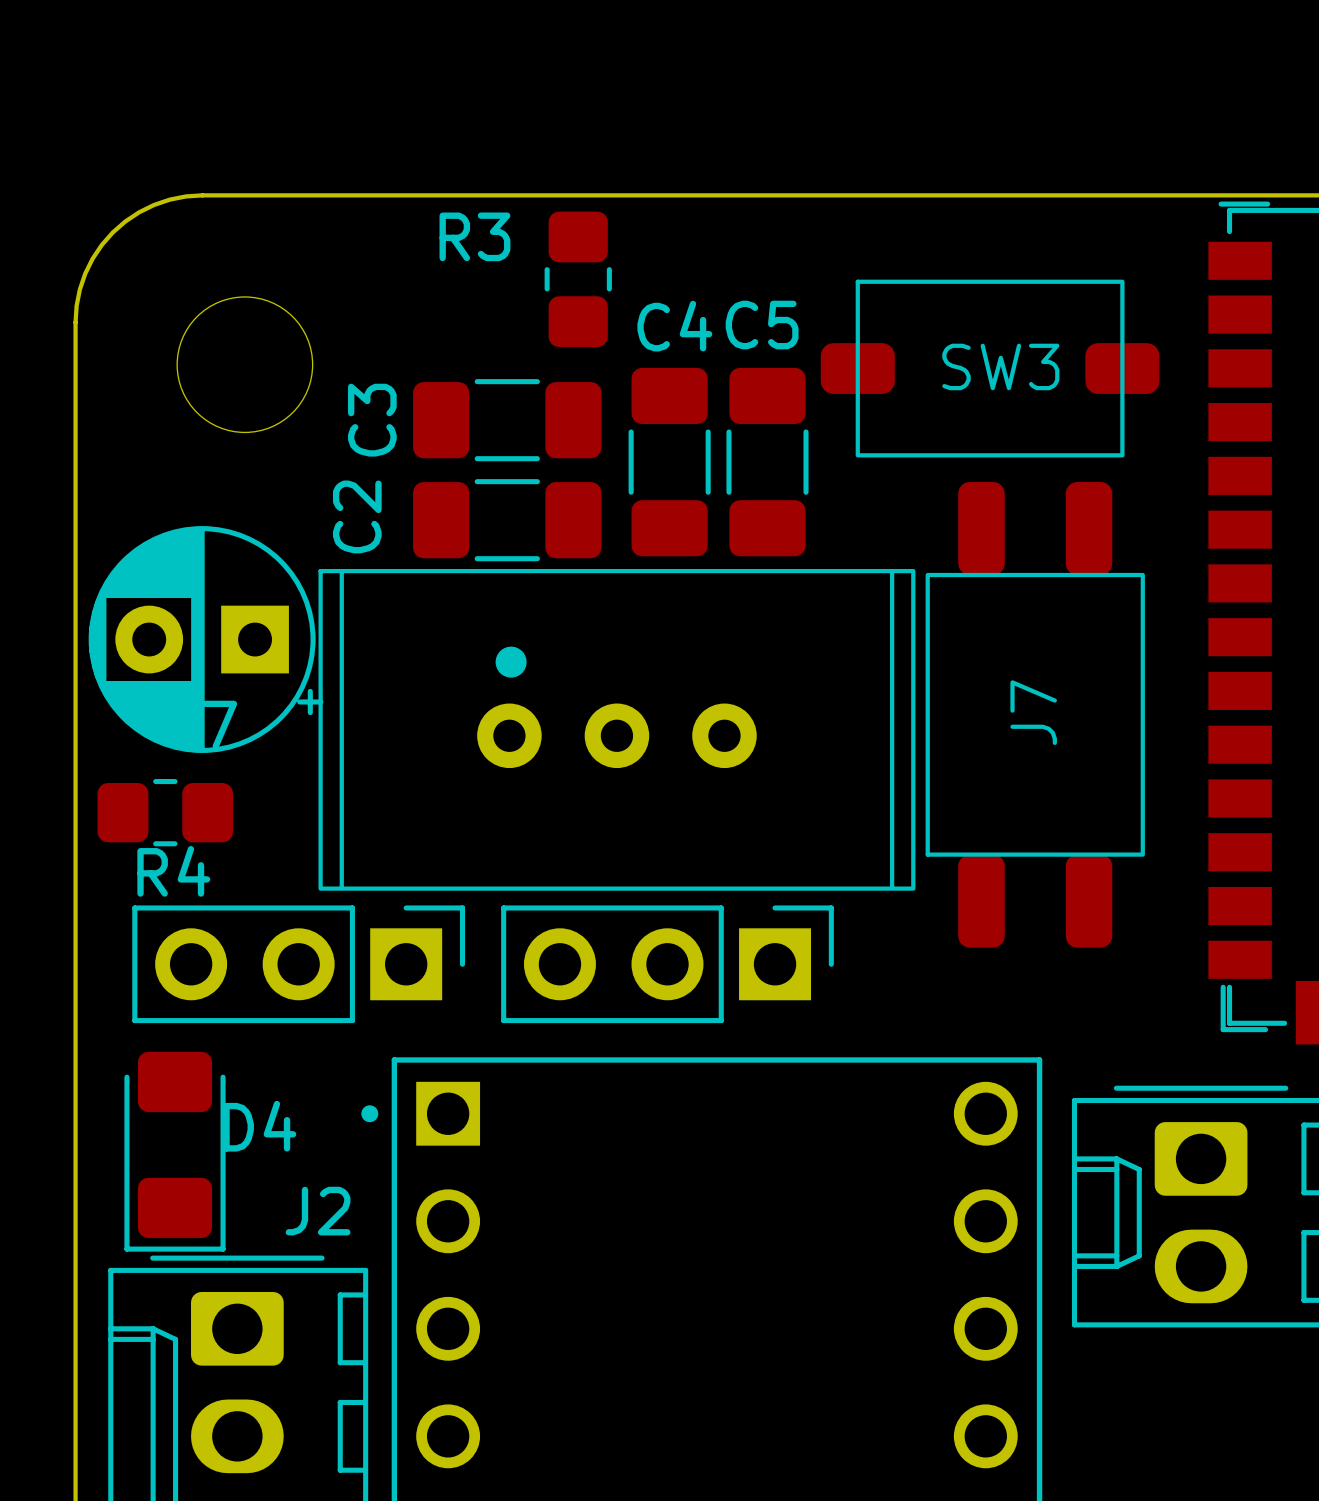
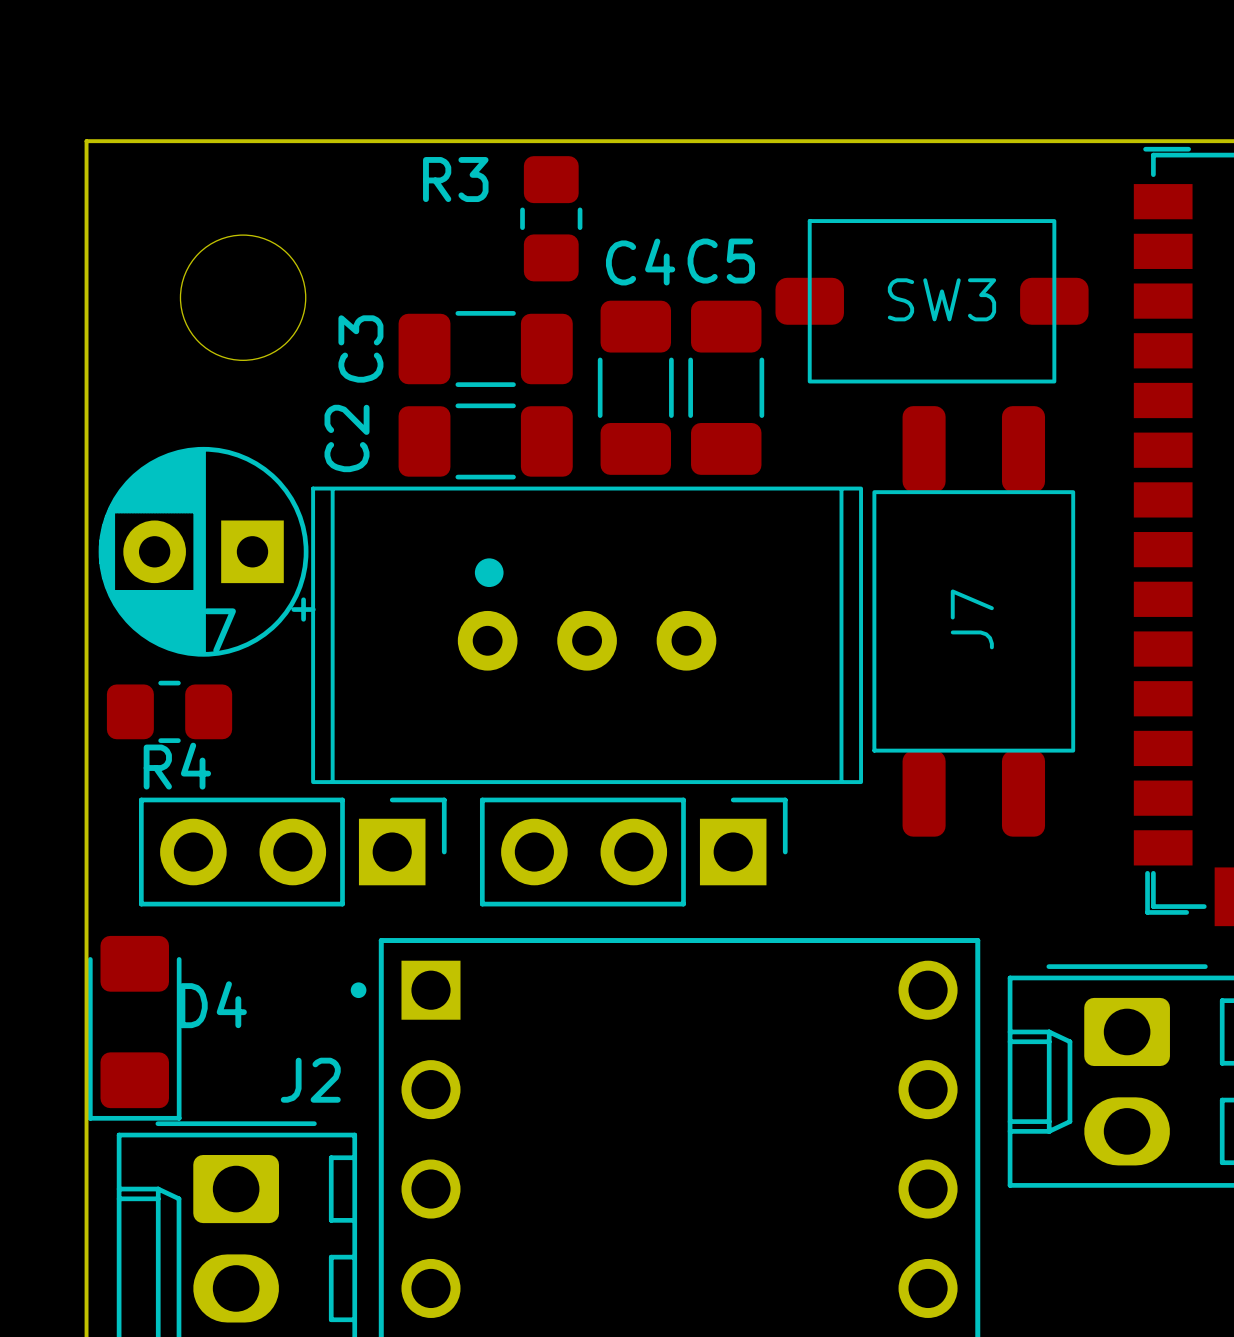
board edge: (202, 195) (185, 196) (153, 205) (125, 221) (112, 232) (101, 245) (85, 273) (79, 289) (75, 322) -> (203, 141) (86, 141) (86, 258)
D4 position: (174, 1151) -> (134, 1028)

